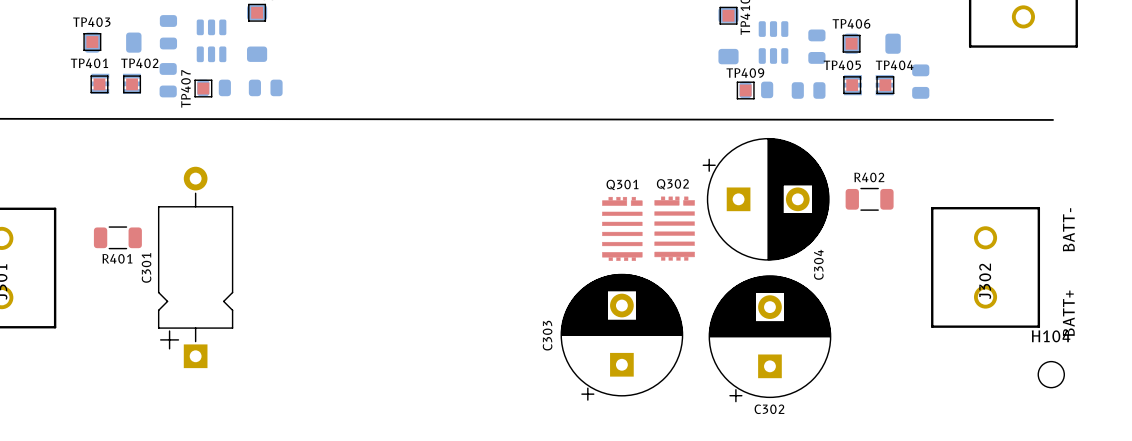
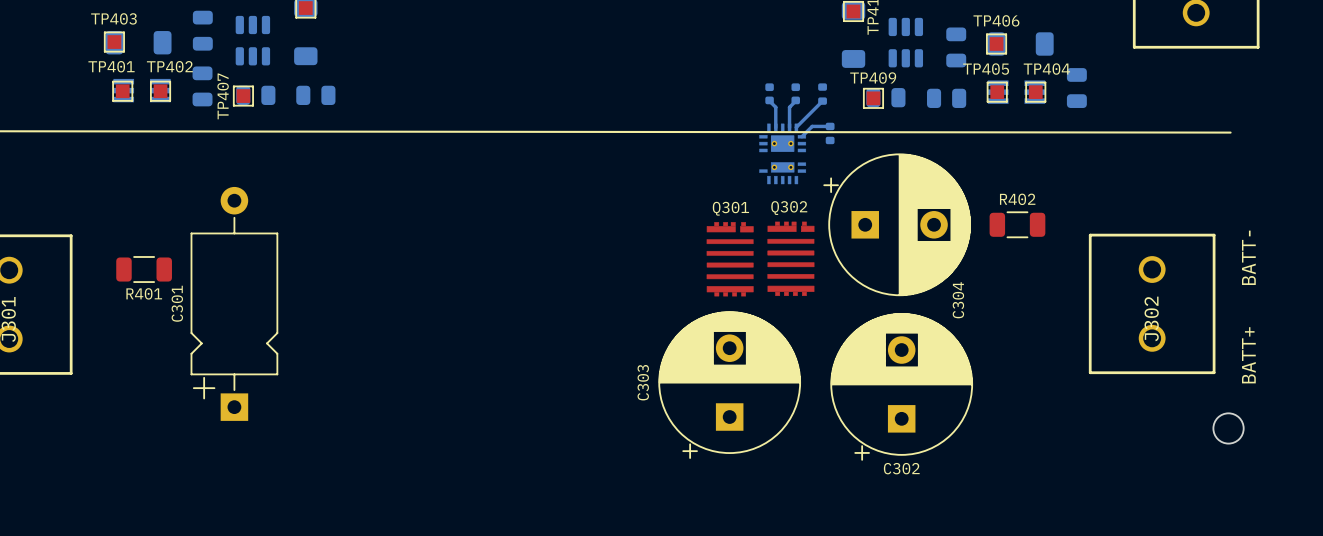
part: none -> (769, 93)
part: none -> (795, 93)
part: none -> (822, 94)
bottom track: none -> (768, 100) (775, 107) (775, 127)
bottom track: none -> (796, 100) (789, 107) (789, 127)
bottom track: none -> (822, 101) (796, 127)
bottom track: none -> (830, 126) (812, 126) (801, 136)
part: none -> (830, 133)
part: none -> (782, 153)
H104 name: H104 (1051, 336) -> none

